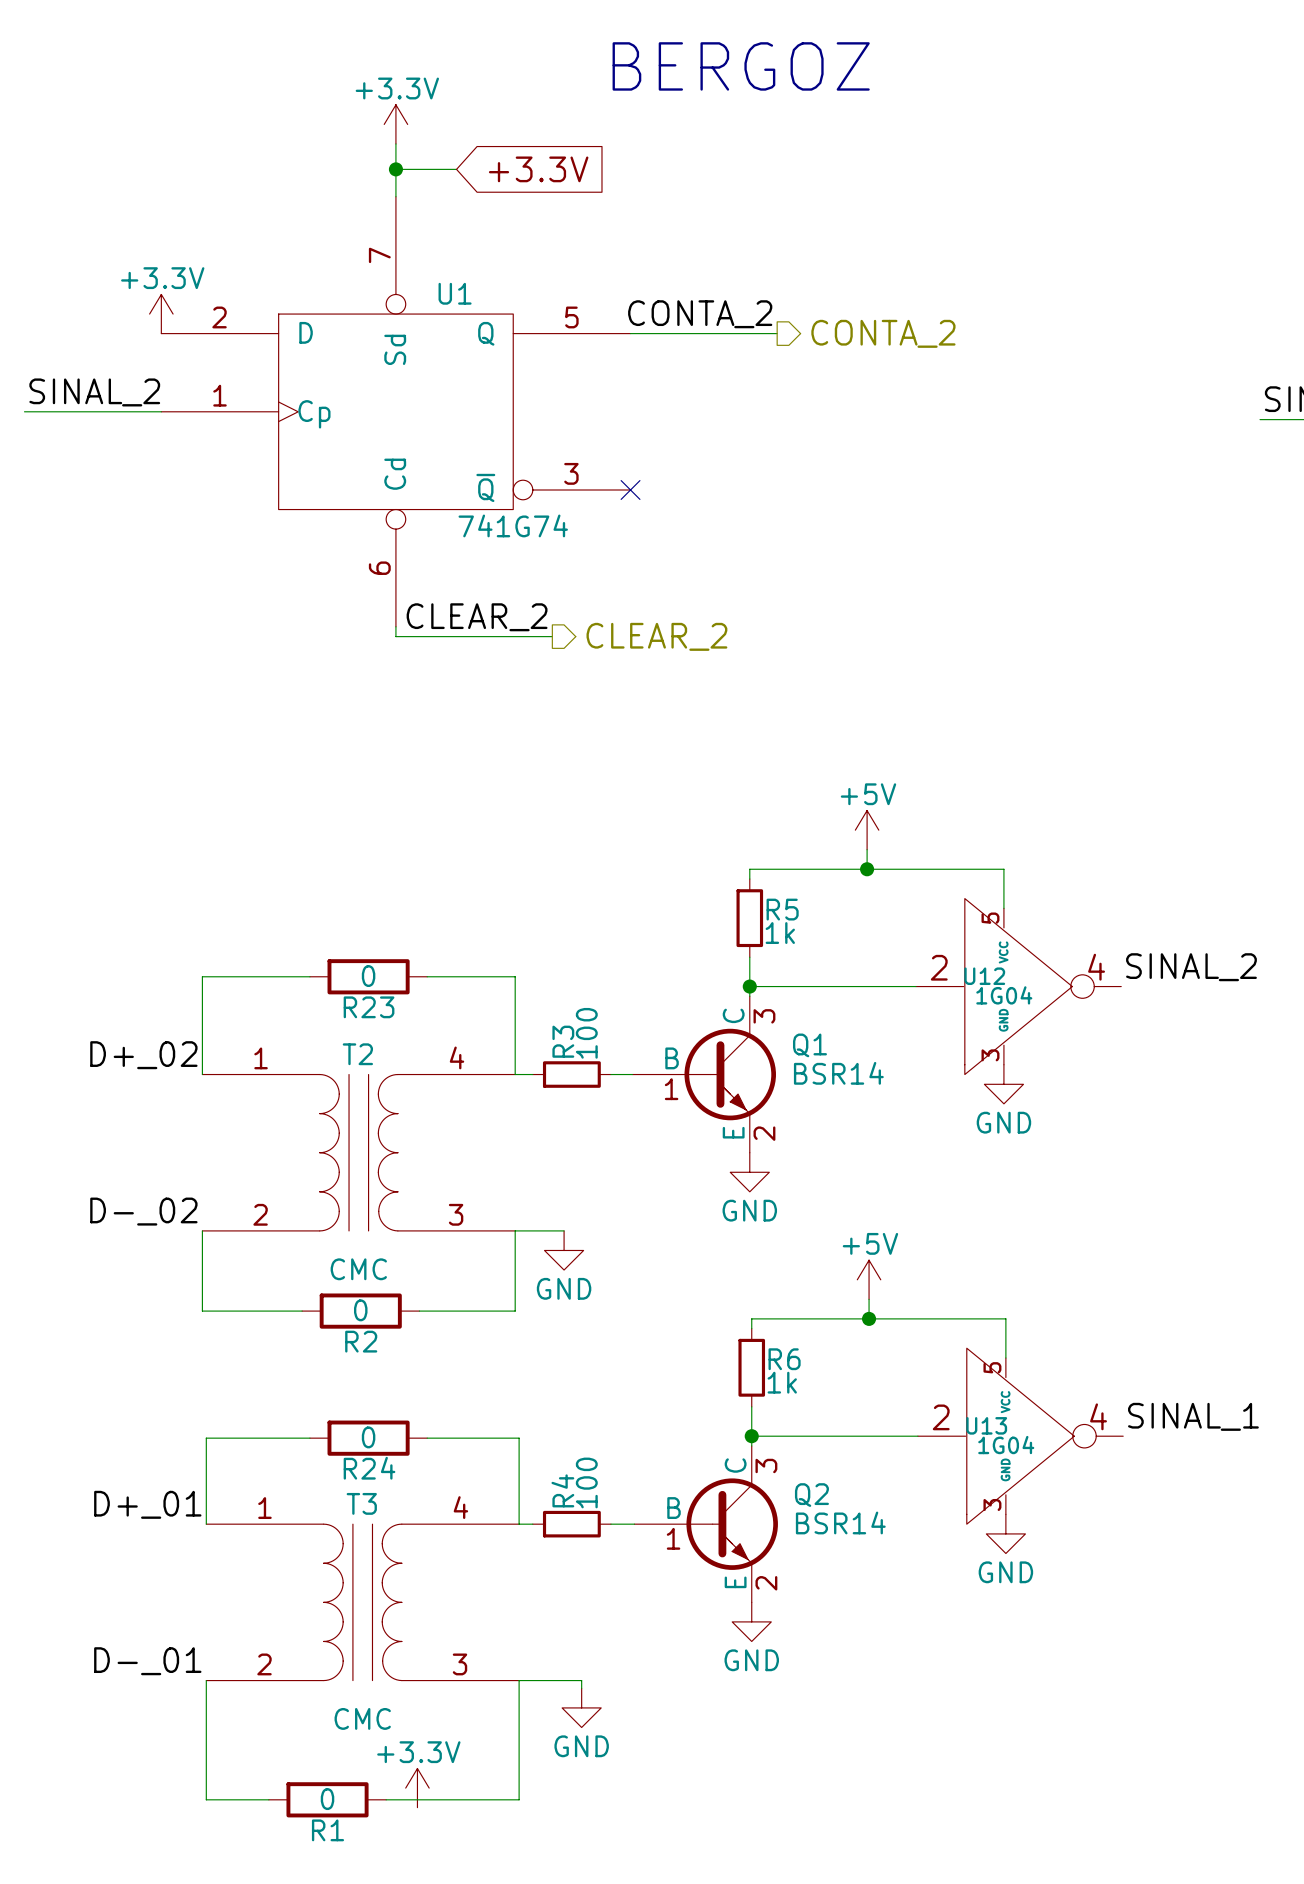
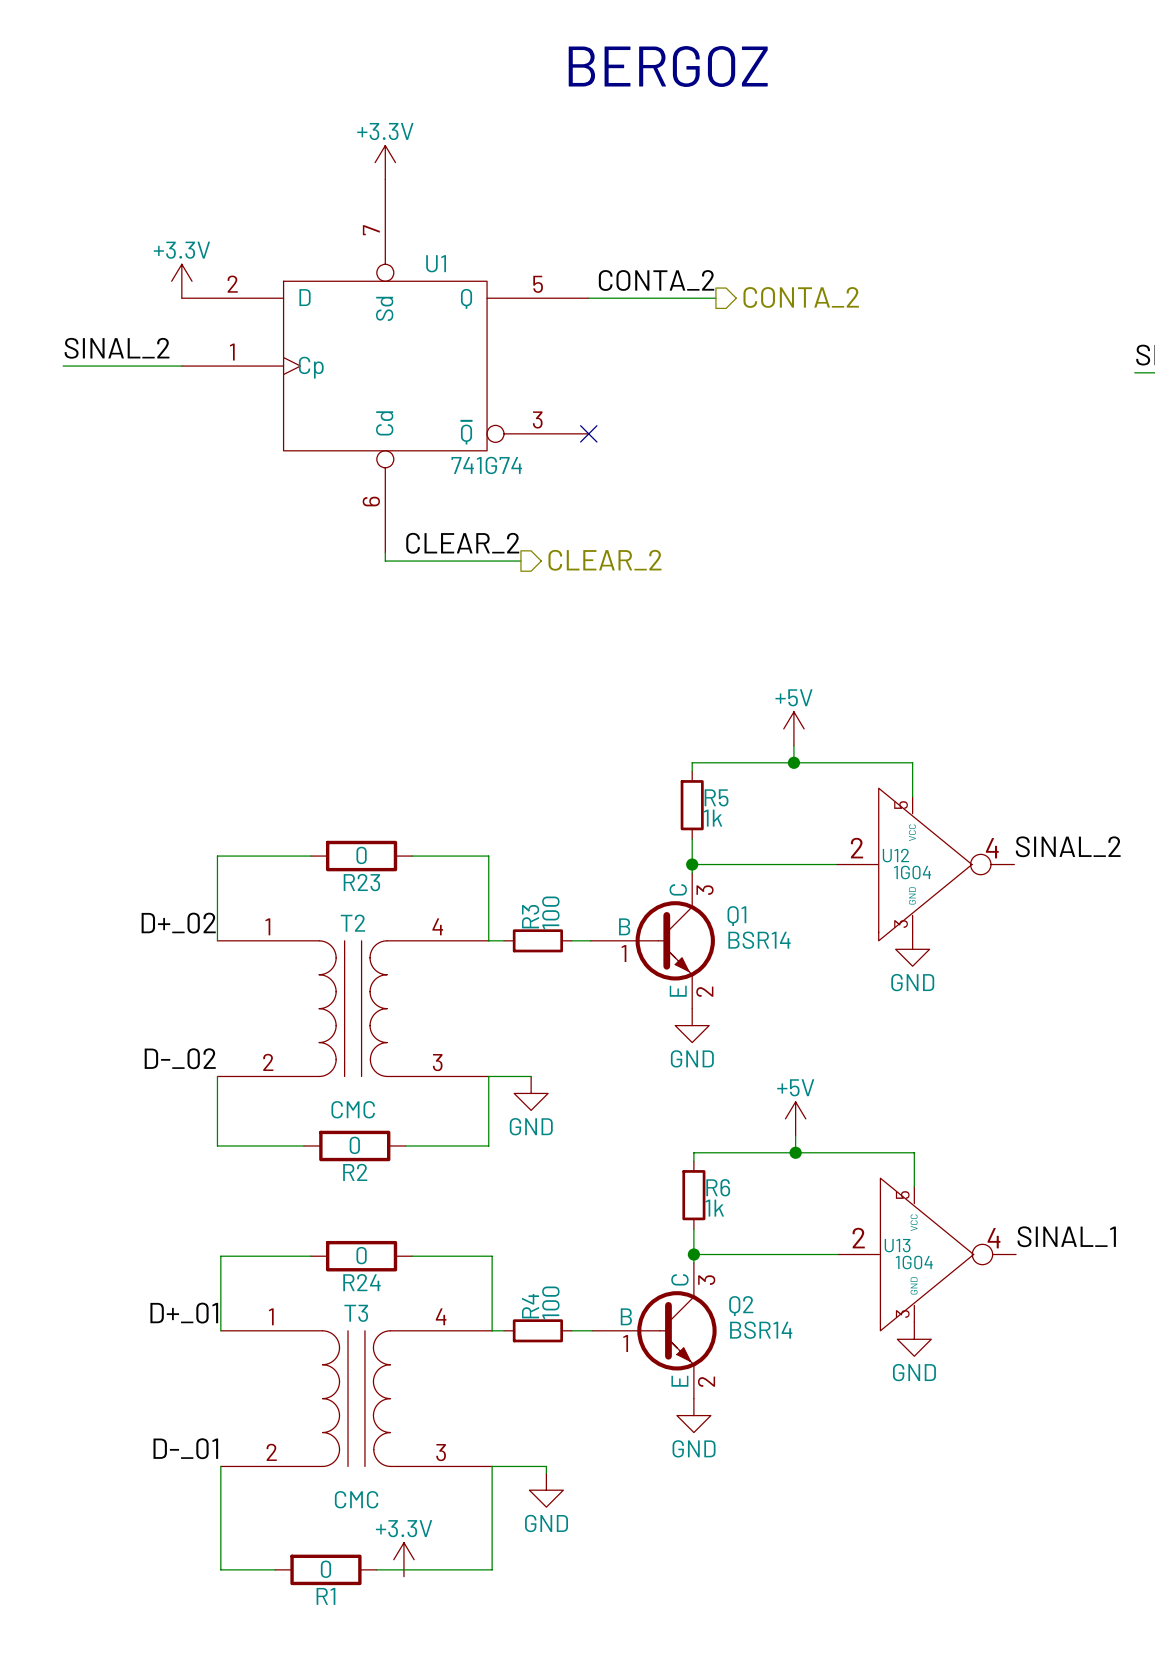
power symbol position: +3.3V (395, 124) -> +3.3V (385, 162)
wire: (395, 169) (456, 169) -> none
junction: (395, 169) -> none
global label: +3.3V (538, 169) -> none

